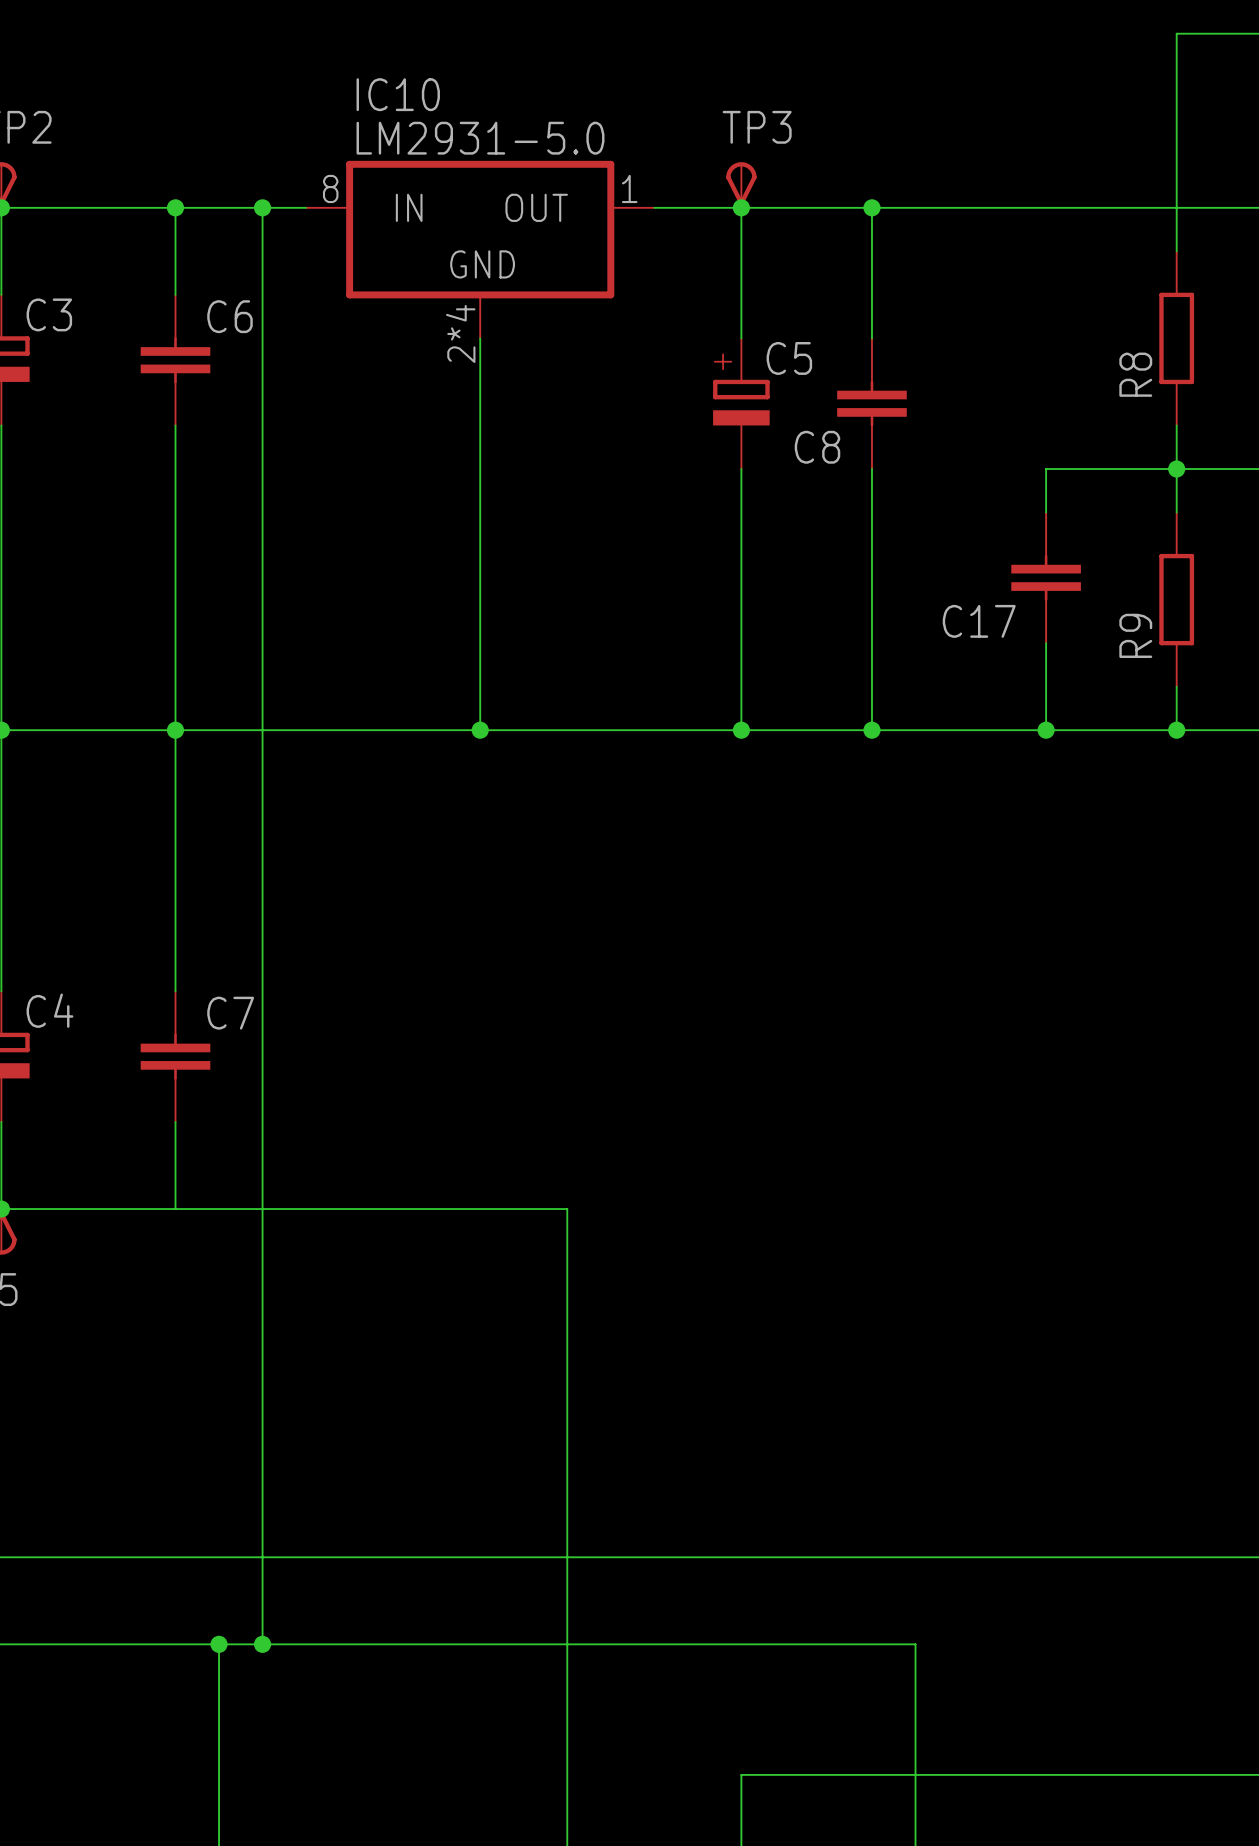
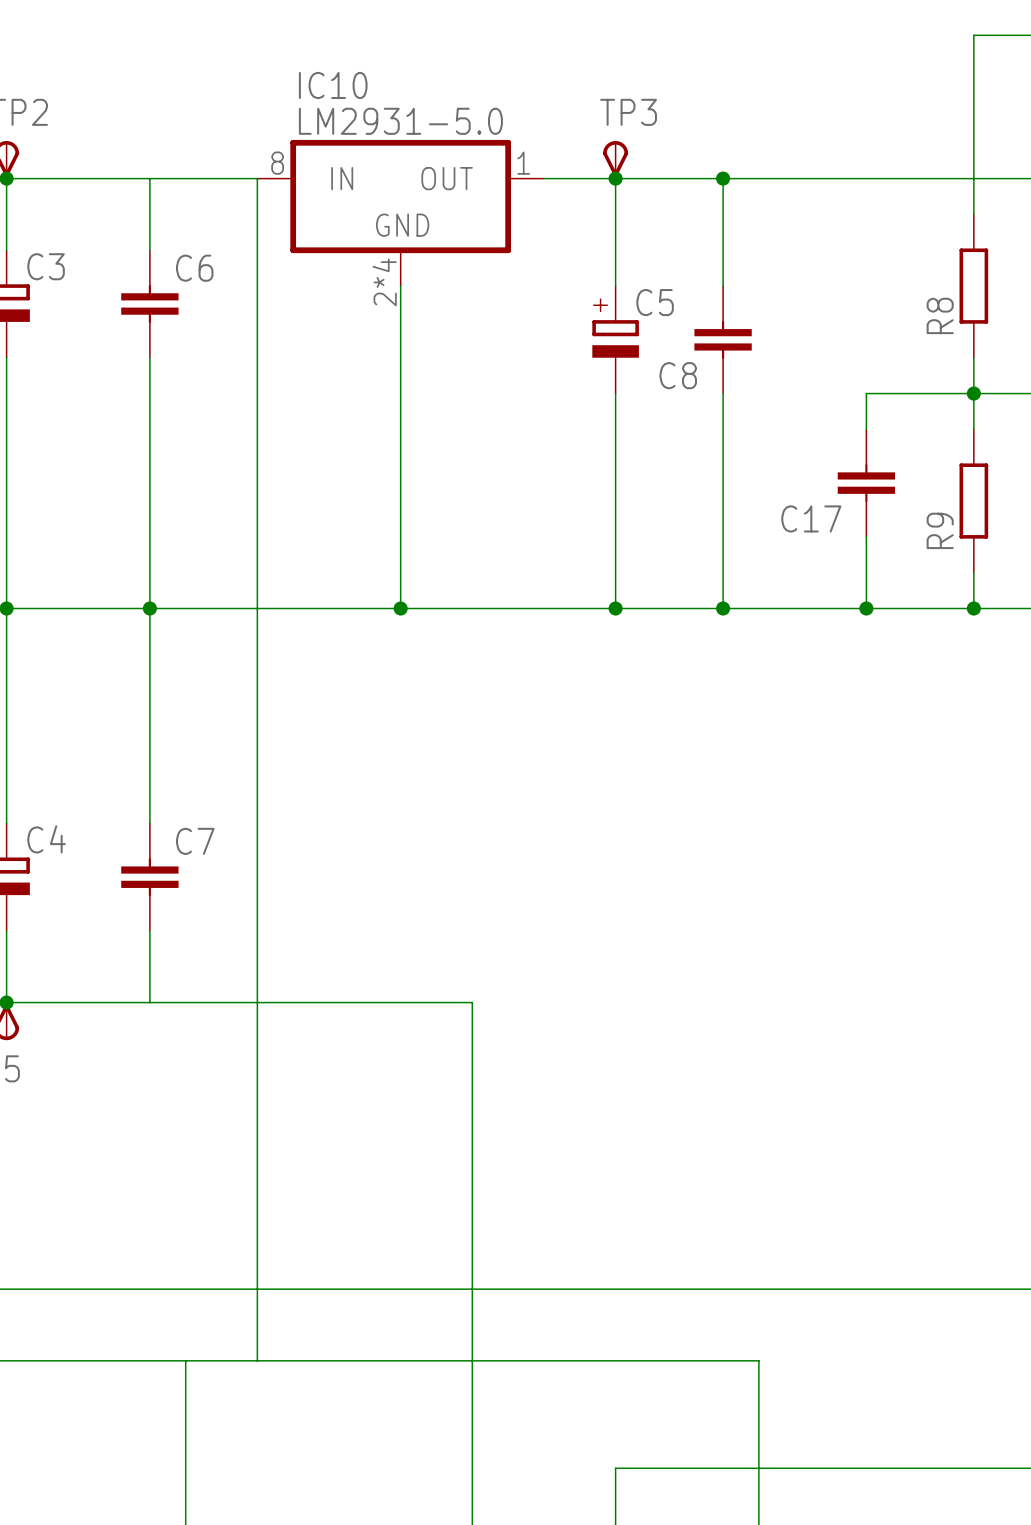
junction: (175, 207) -> none
wire: (262, 207) (262, 1644) -> (257, 178) (257, 1360)
junction: (262, 207) -> none
junction: (219, 1644) -> none
junction: (262, 1644) -> none

